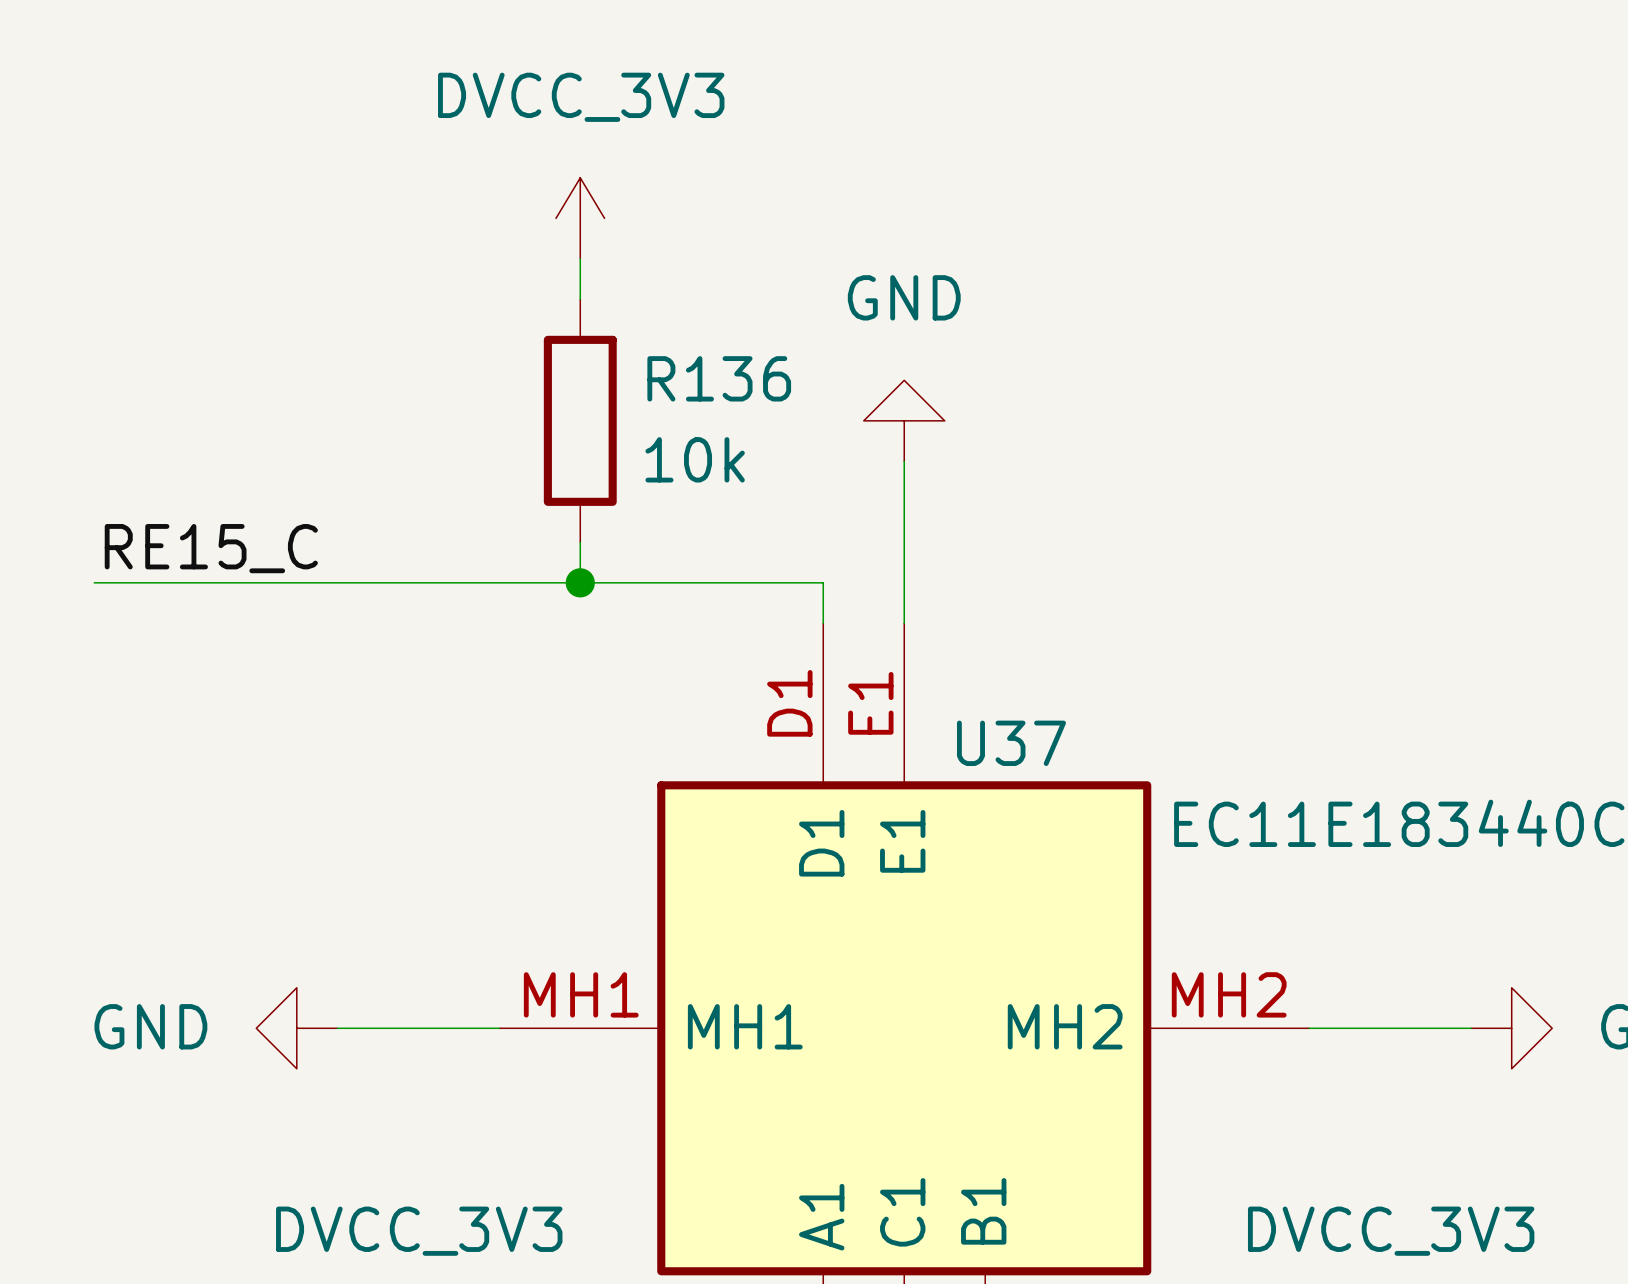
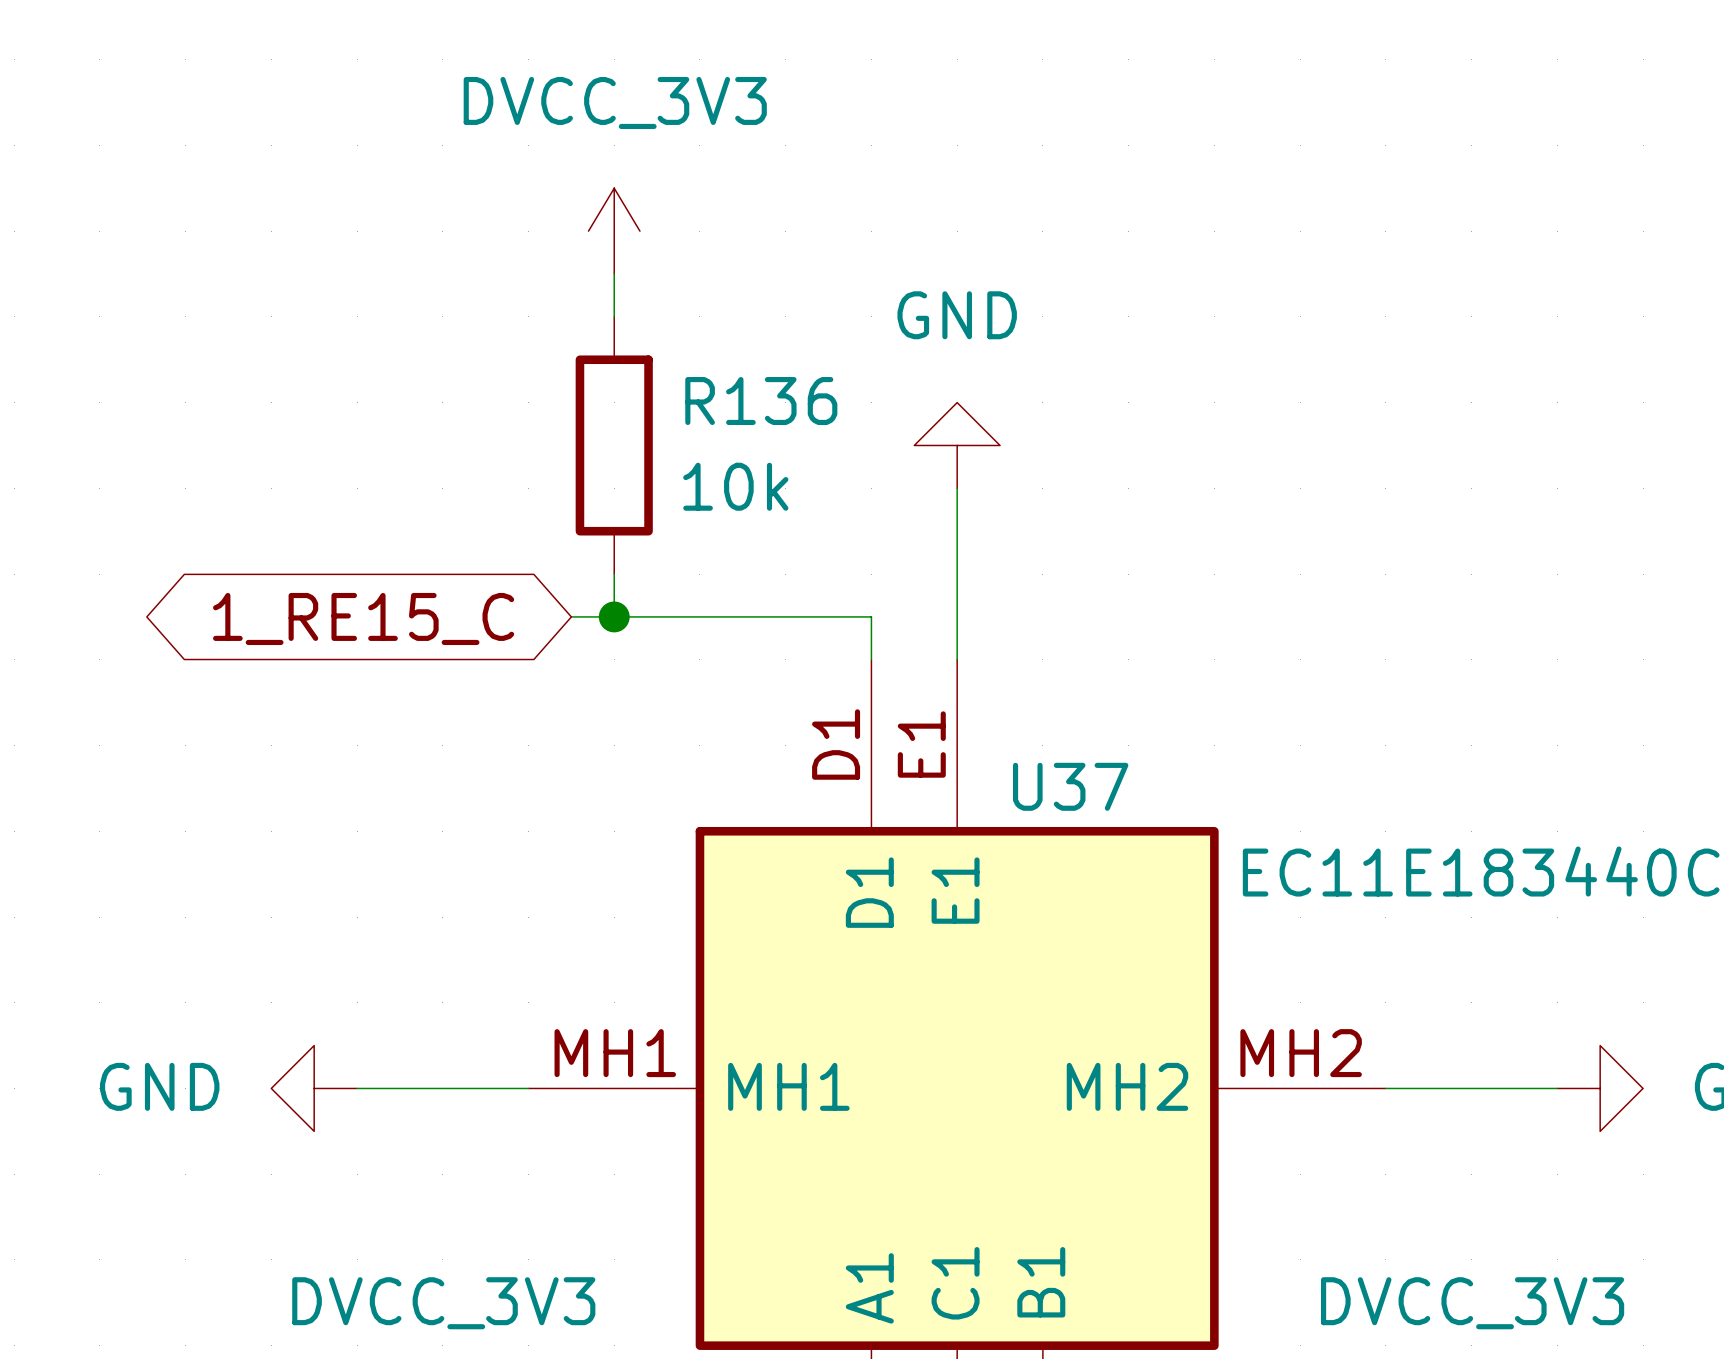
label: RE15_C (211, 548) -> none
wire: (94, 582) (539, 582) -> none
global label: none -> 1_RE15_C (363, 618)

